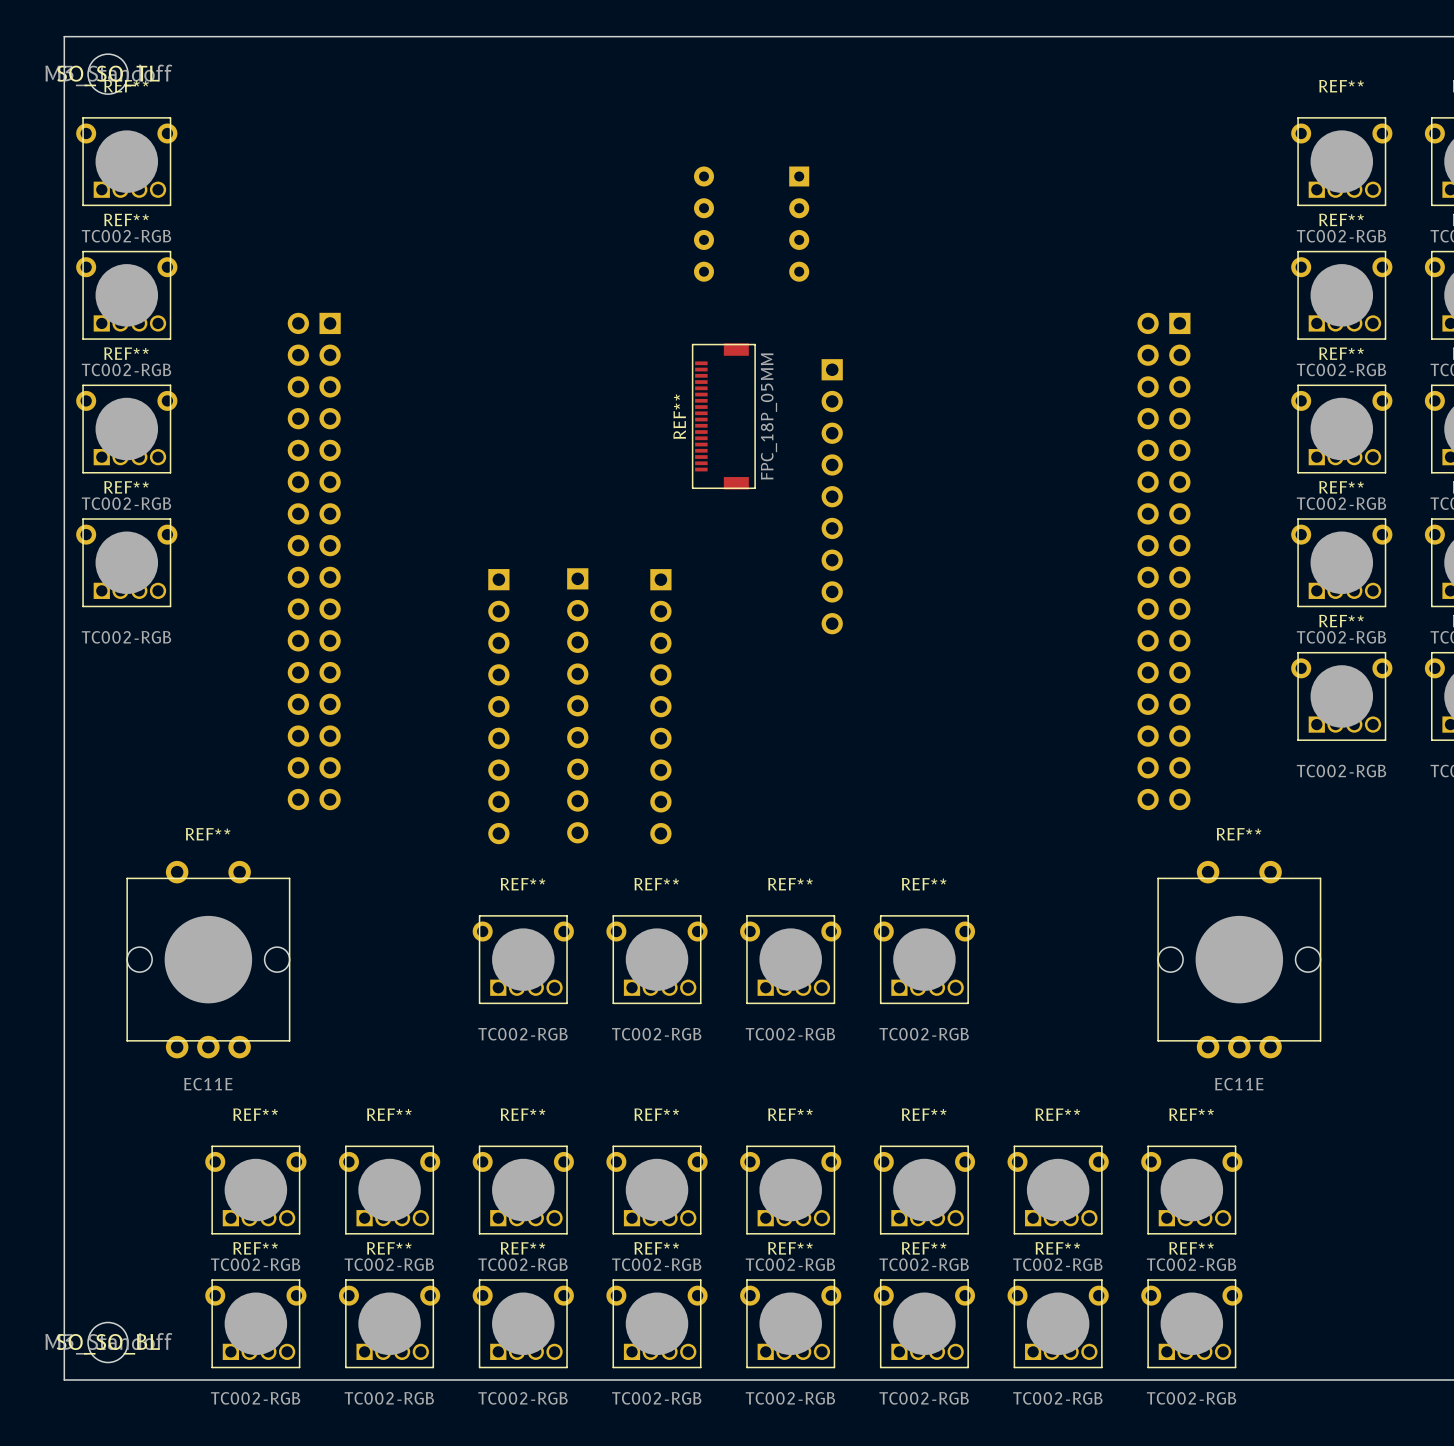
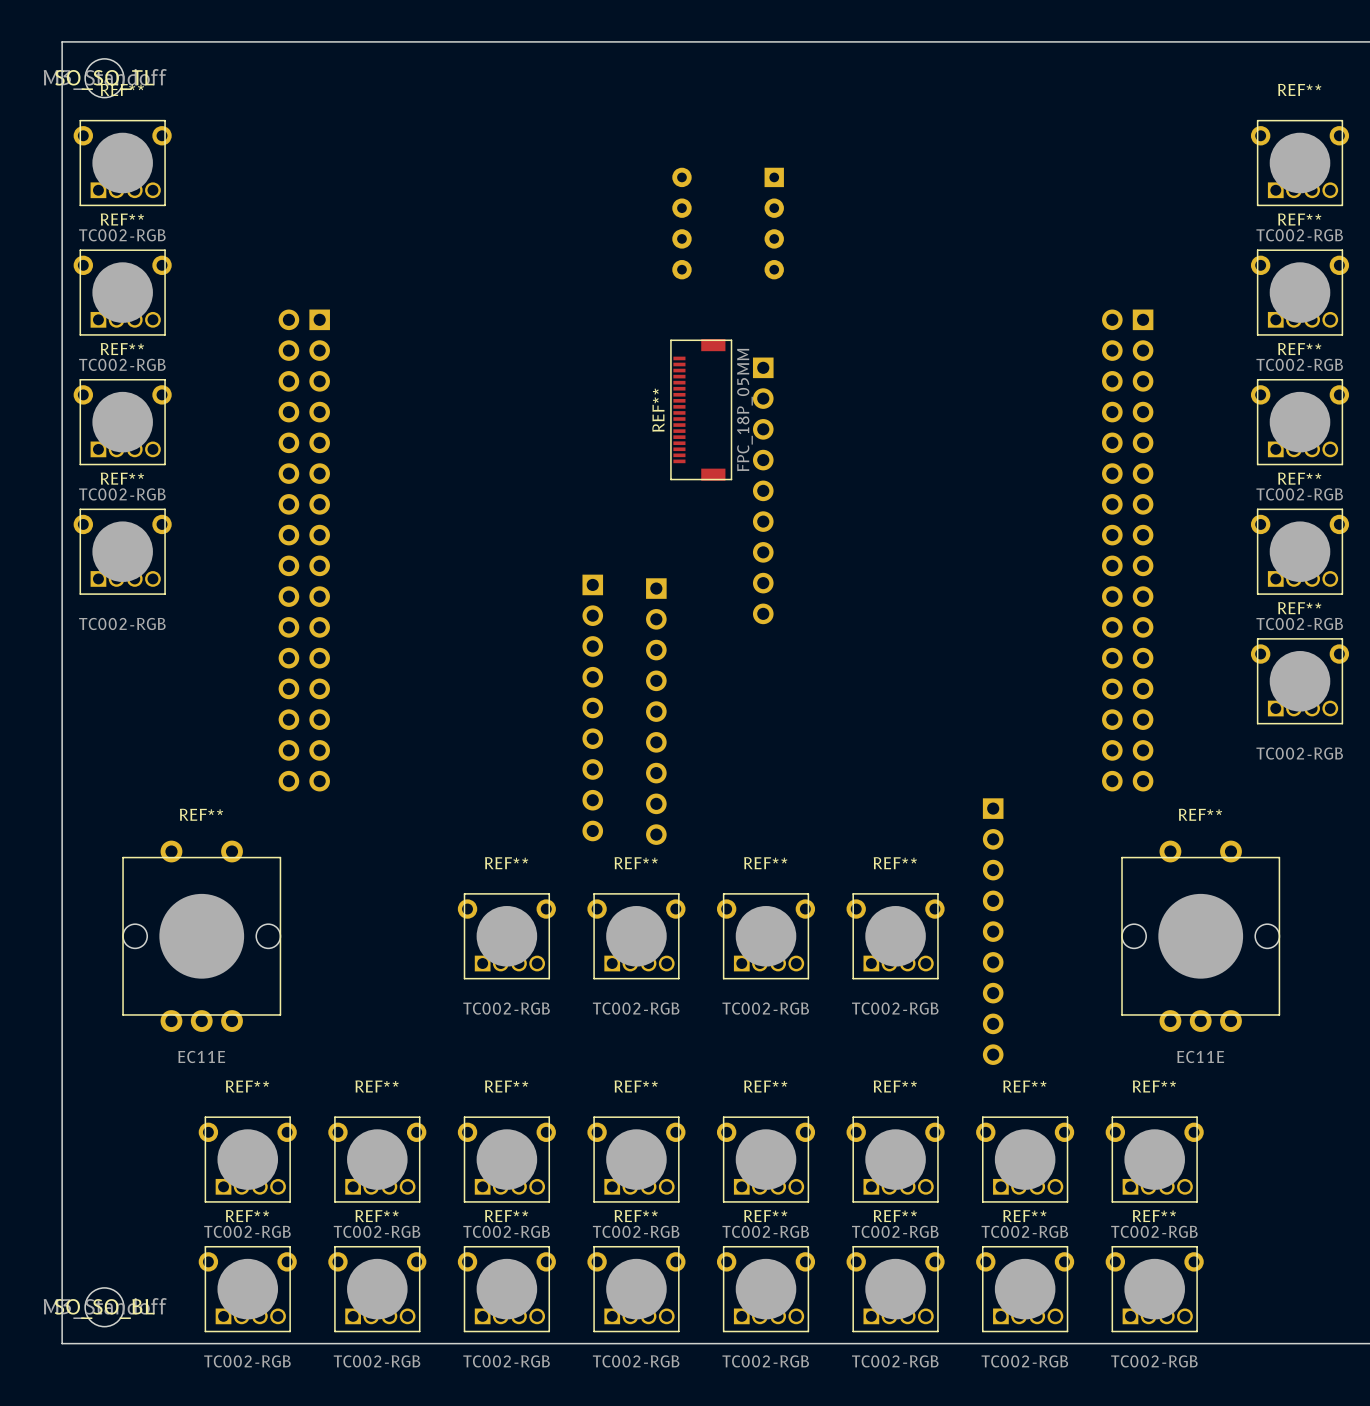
part position: (832, 496) -> (763, 490)
part: (577, 705) -> none
part: (498, 706) -> none
part: (660, 706) -> none
part: none -> (592, 707)
part: none -> (656, 711)
part: none -> (993, 931)

